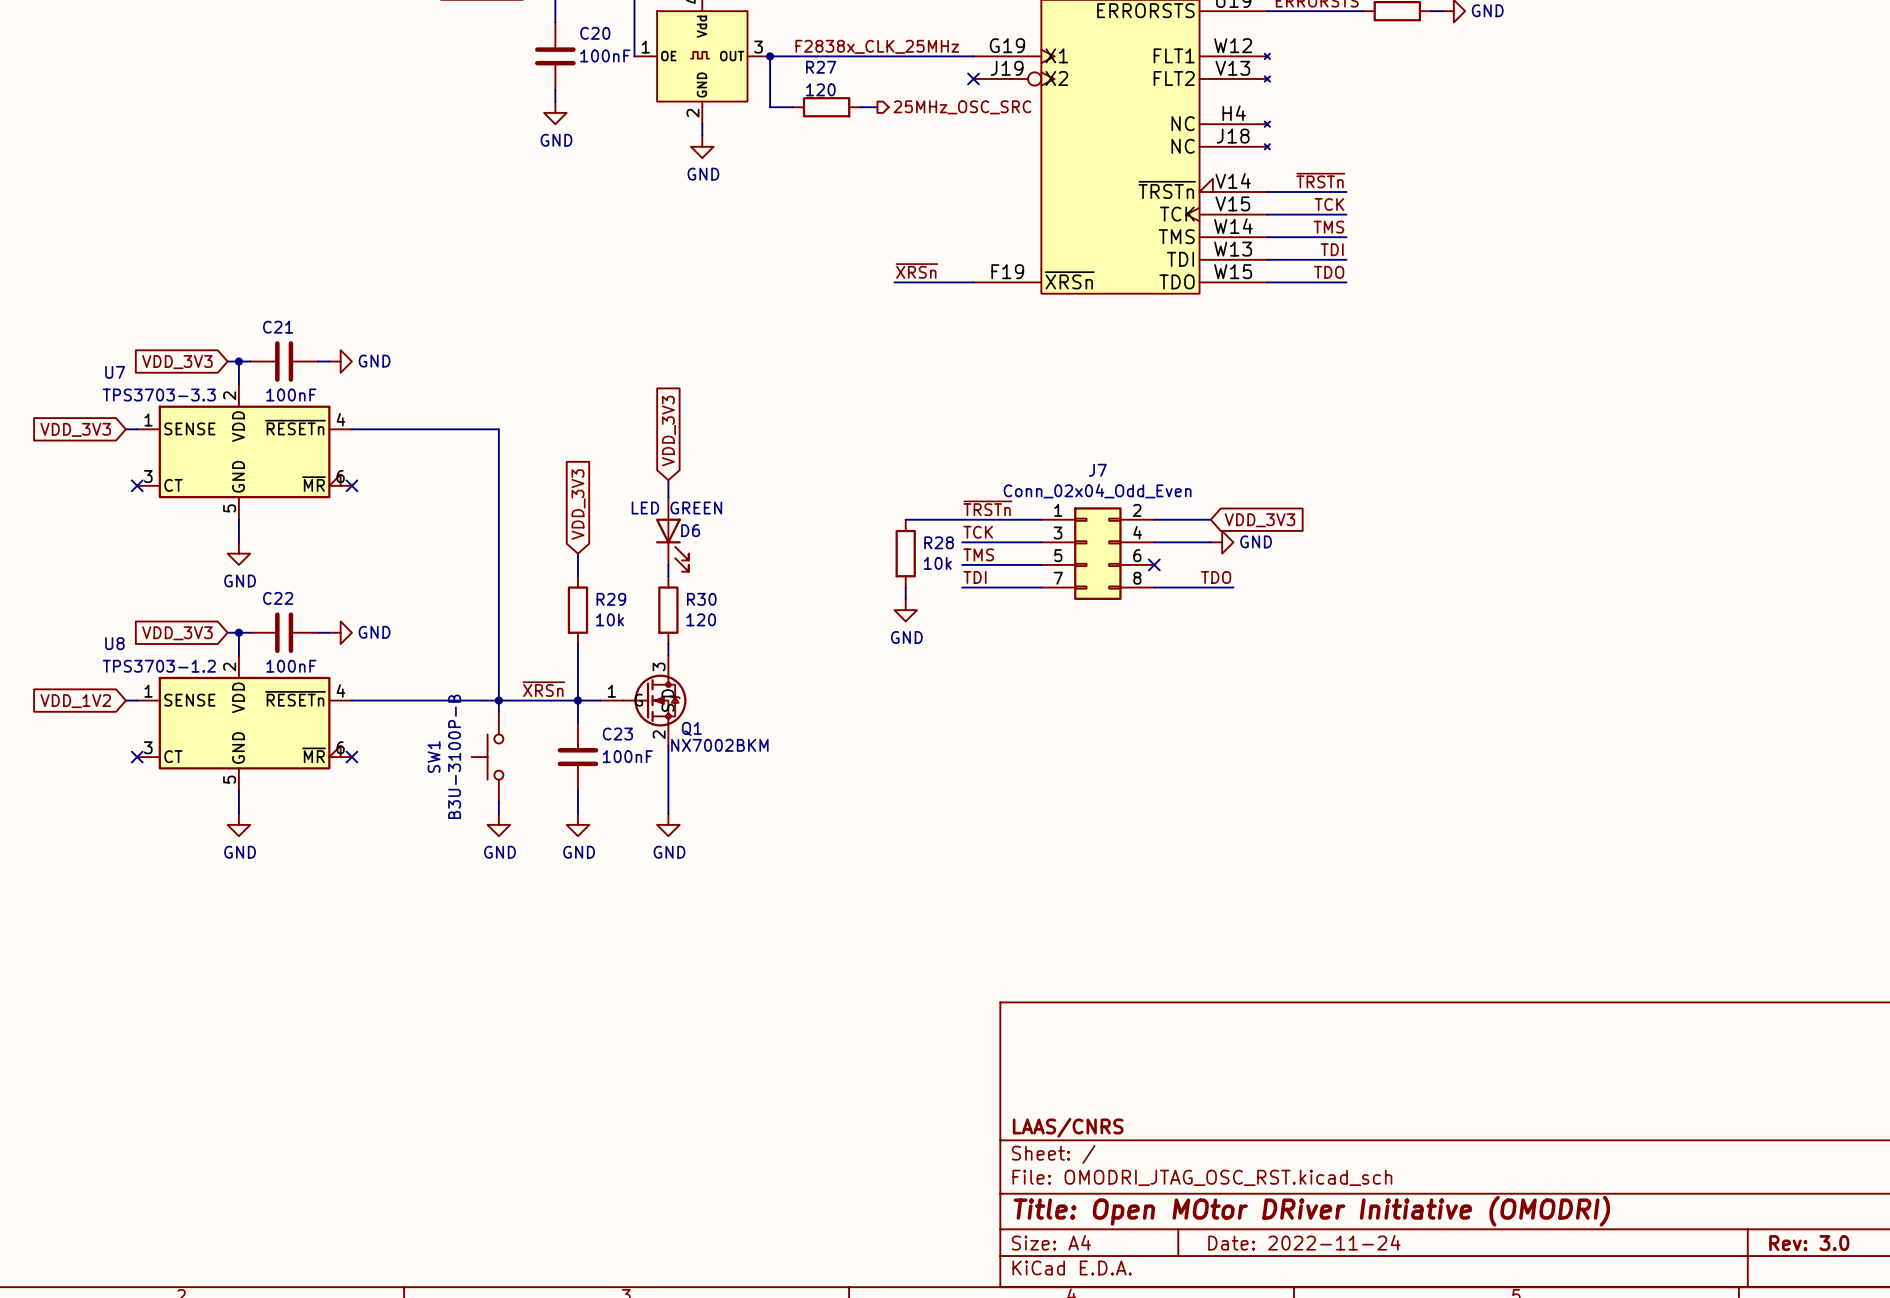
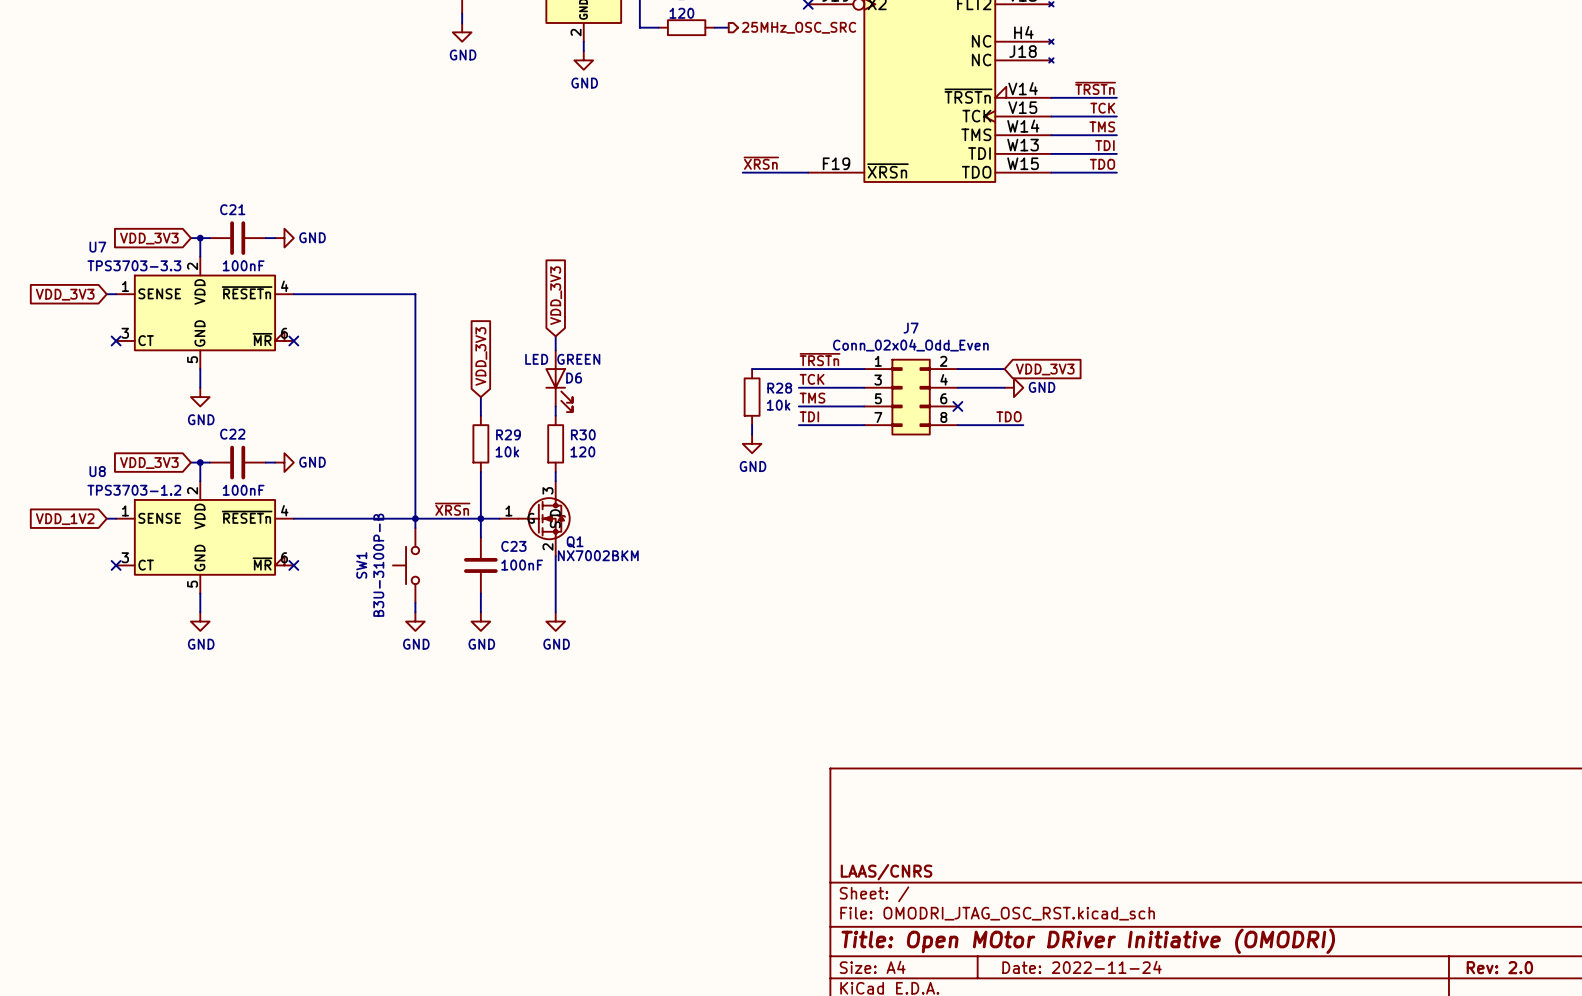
title block: Rev: 3.0 (1809, 1243) -> Rev: 2.0 (1499, 967)

